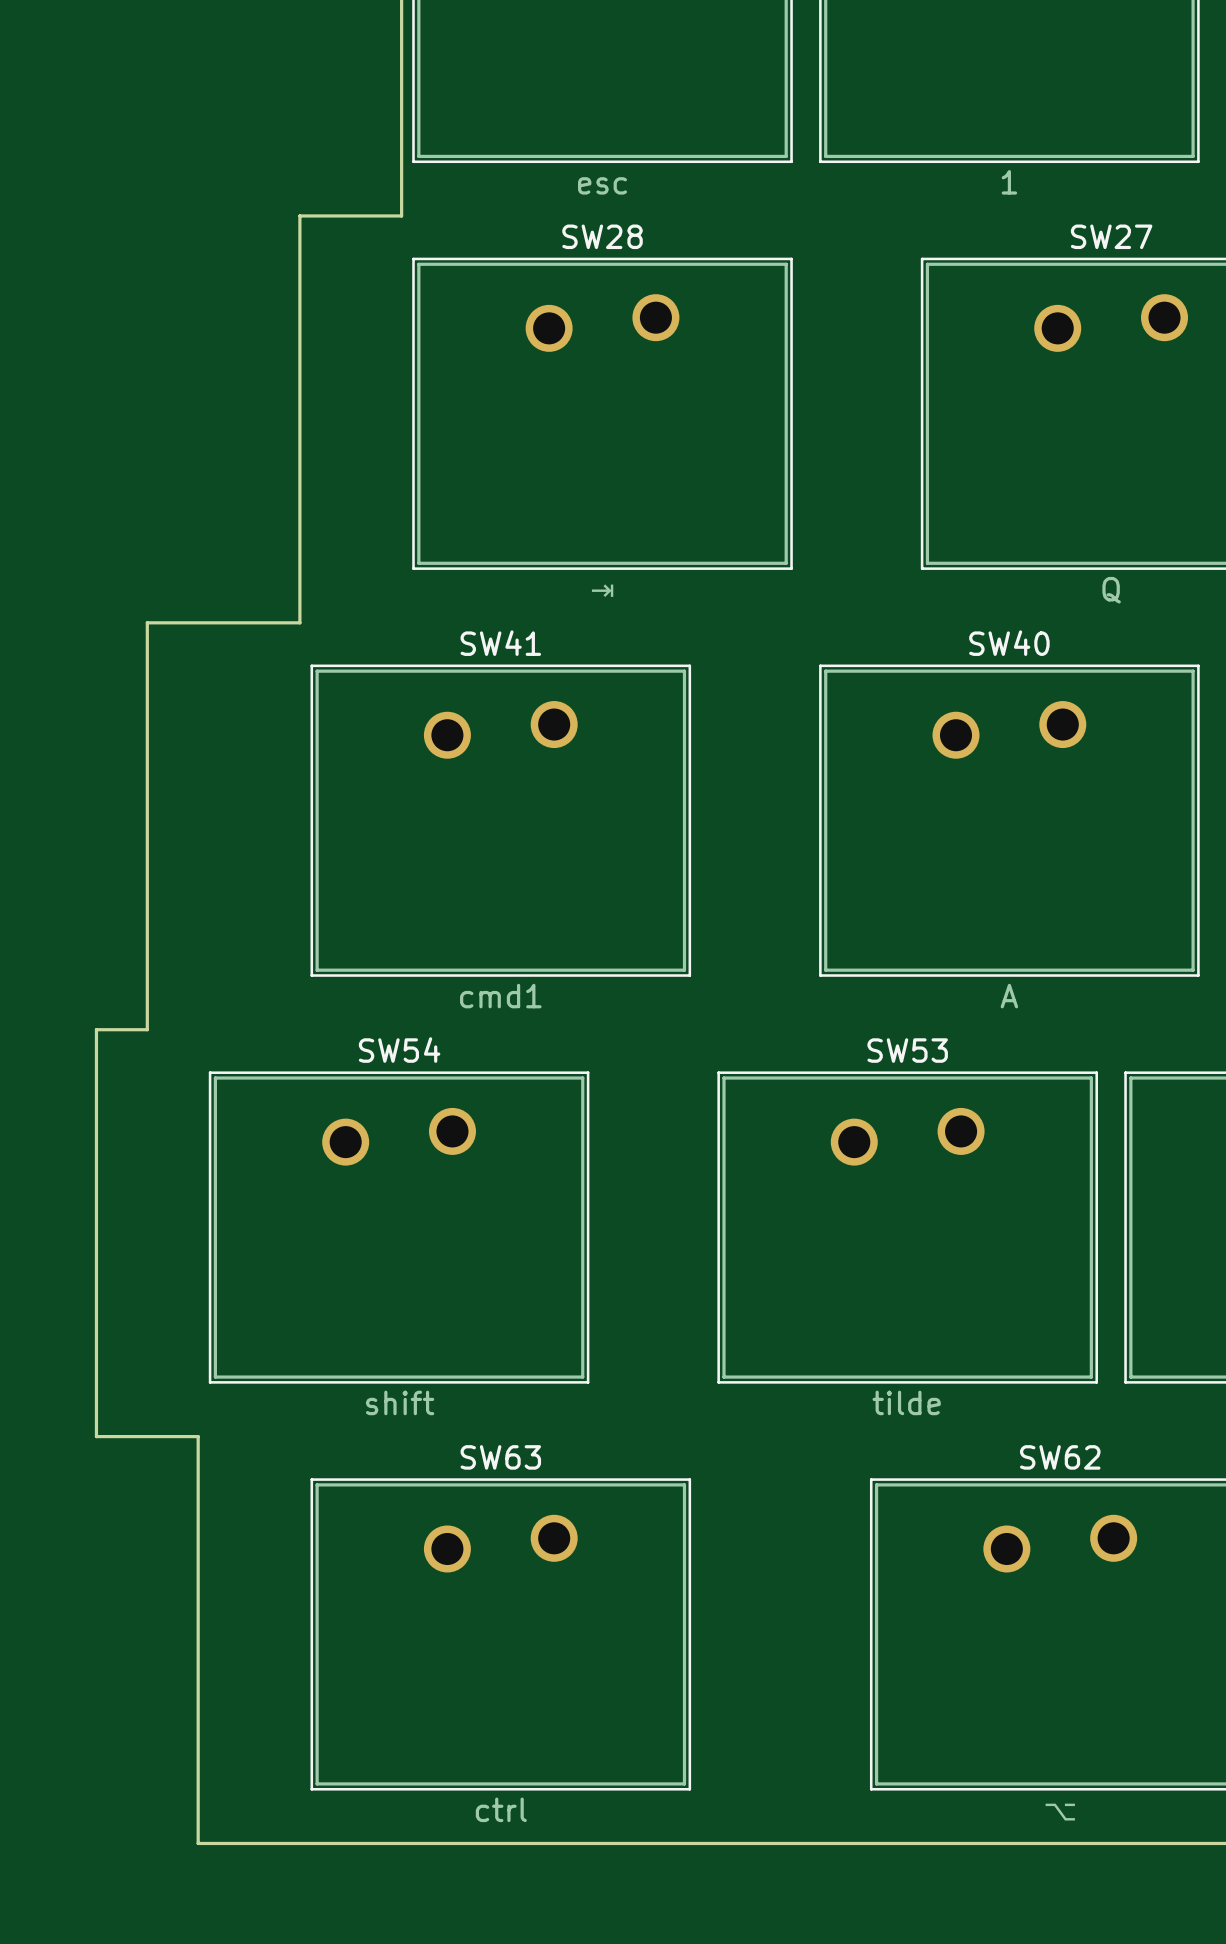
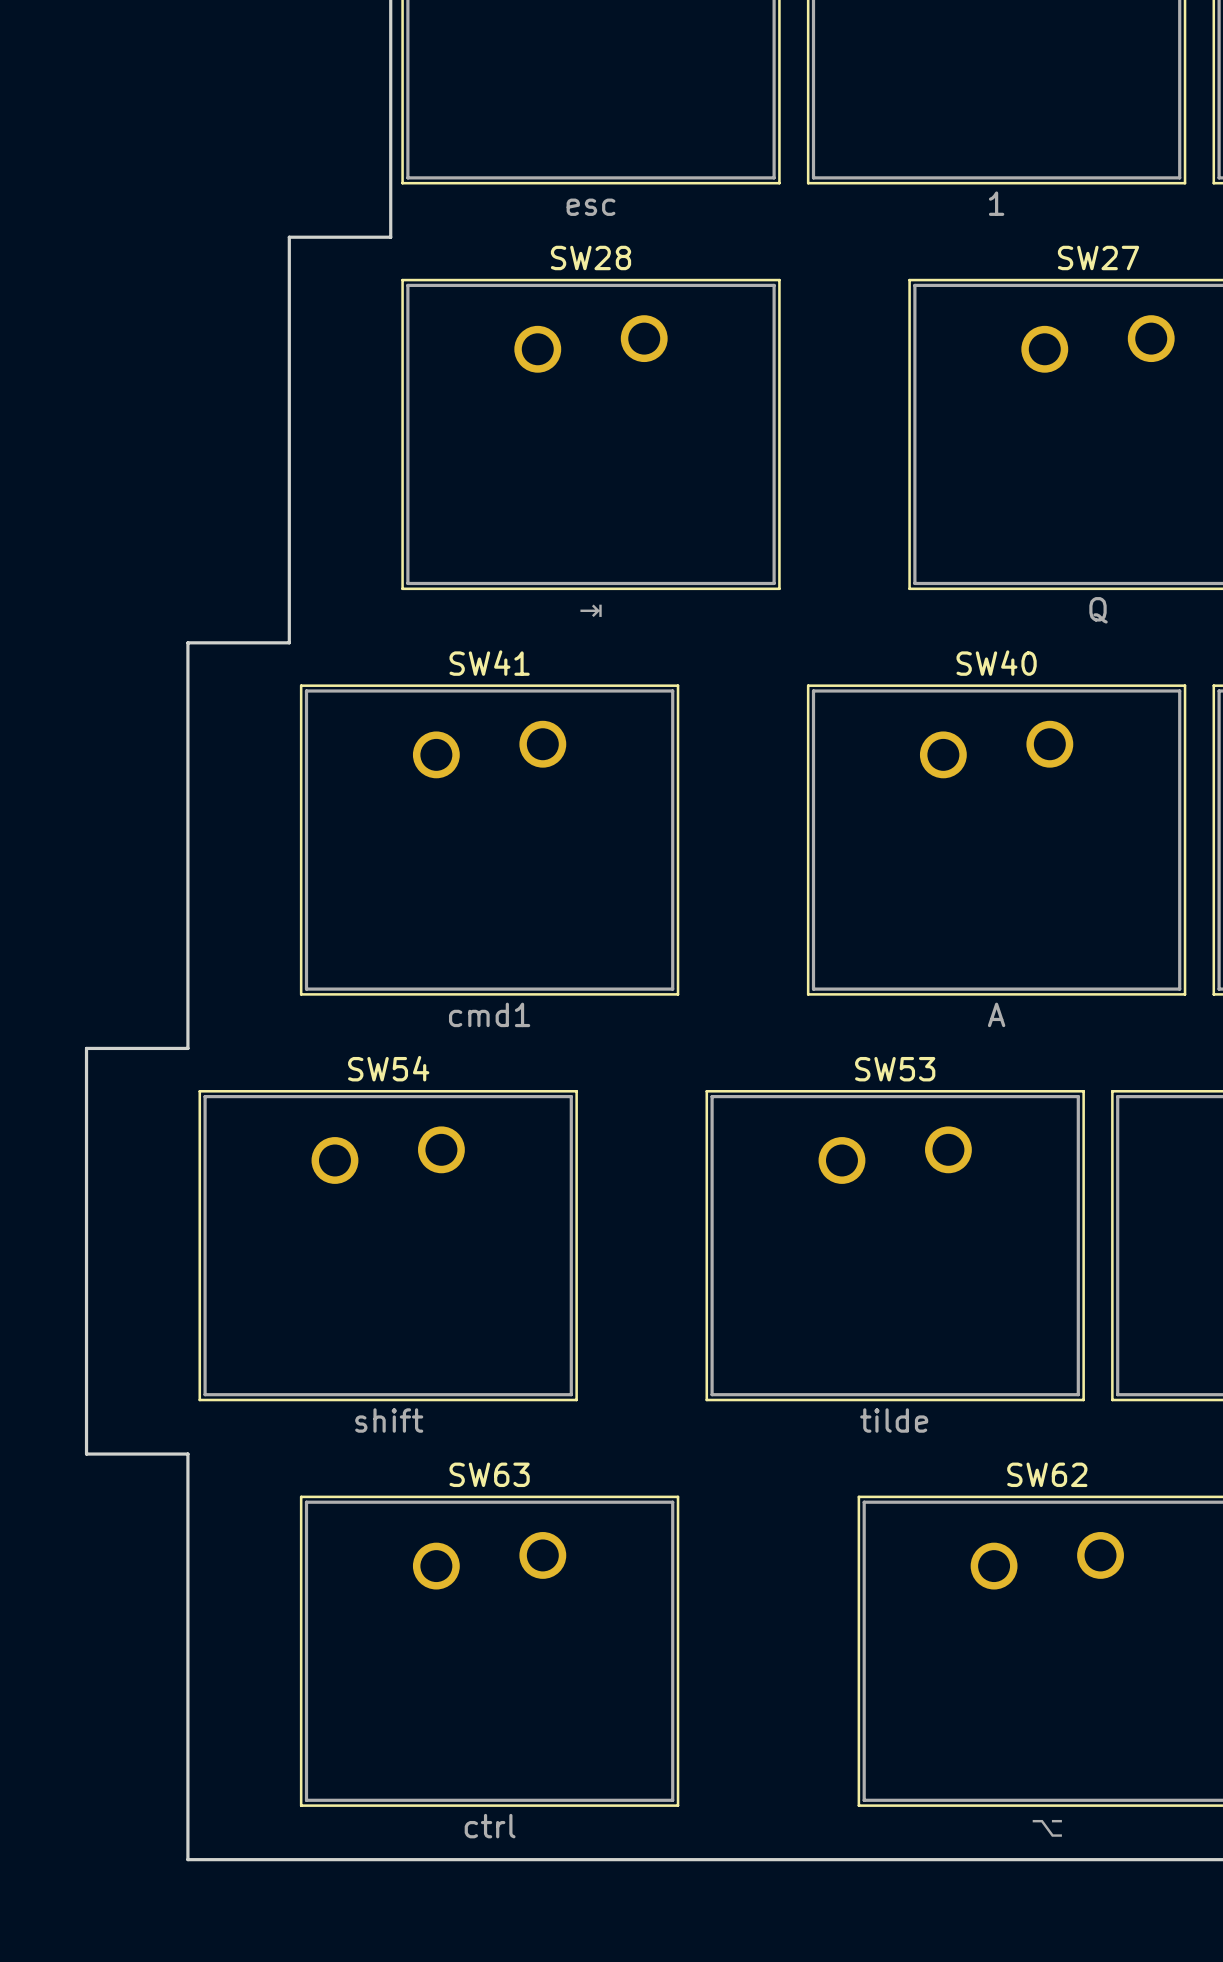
board edge: (198, 622) (147, 622) (147, 1029) -> (187, 642) (187, 1048) (137, 1048)

